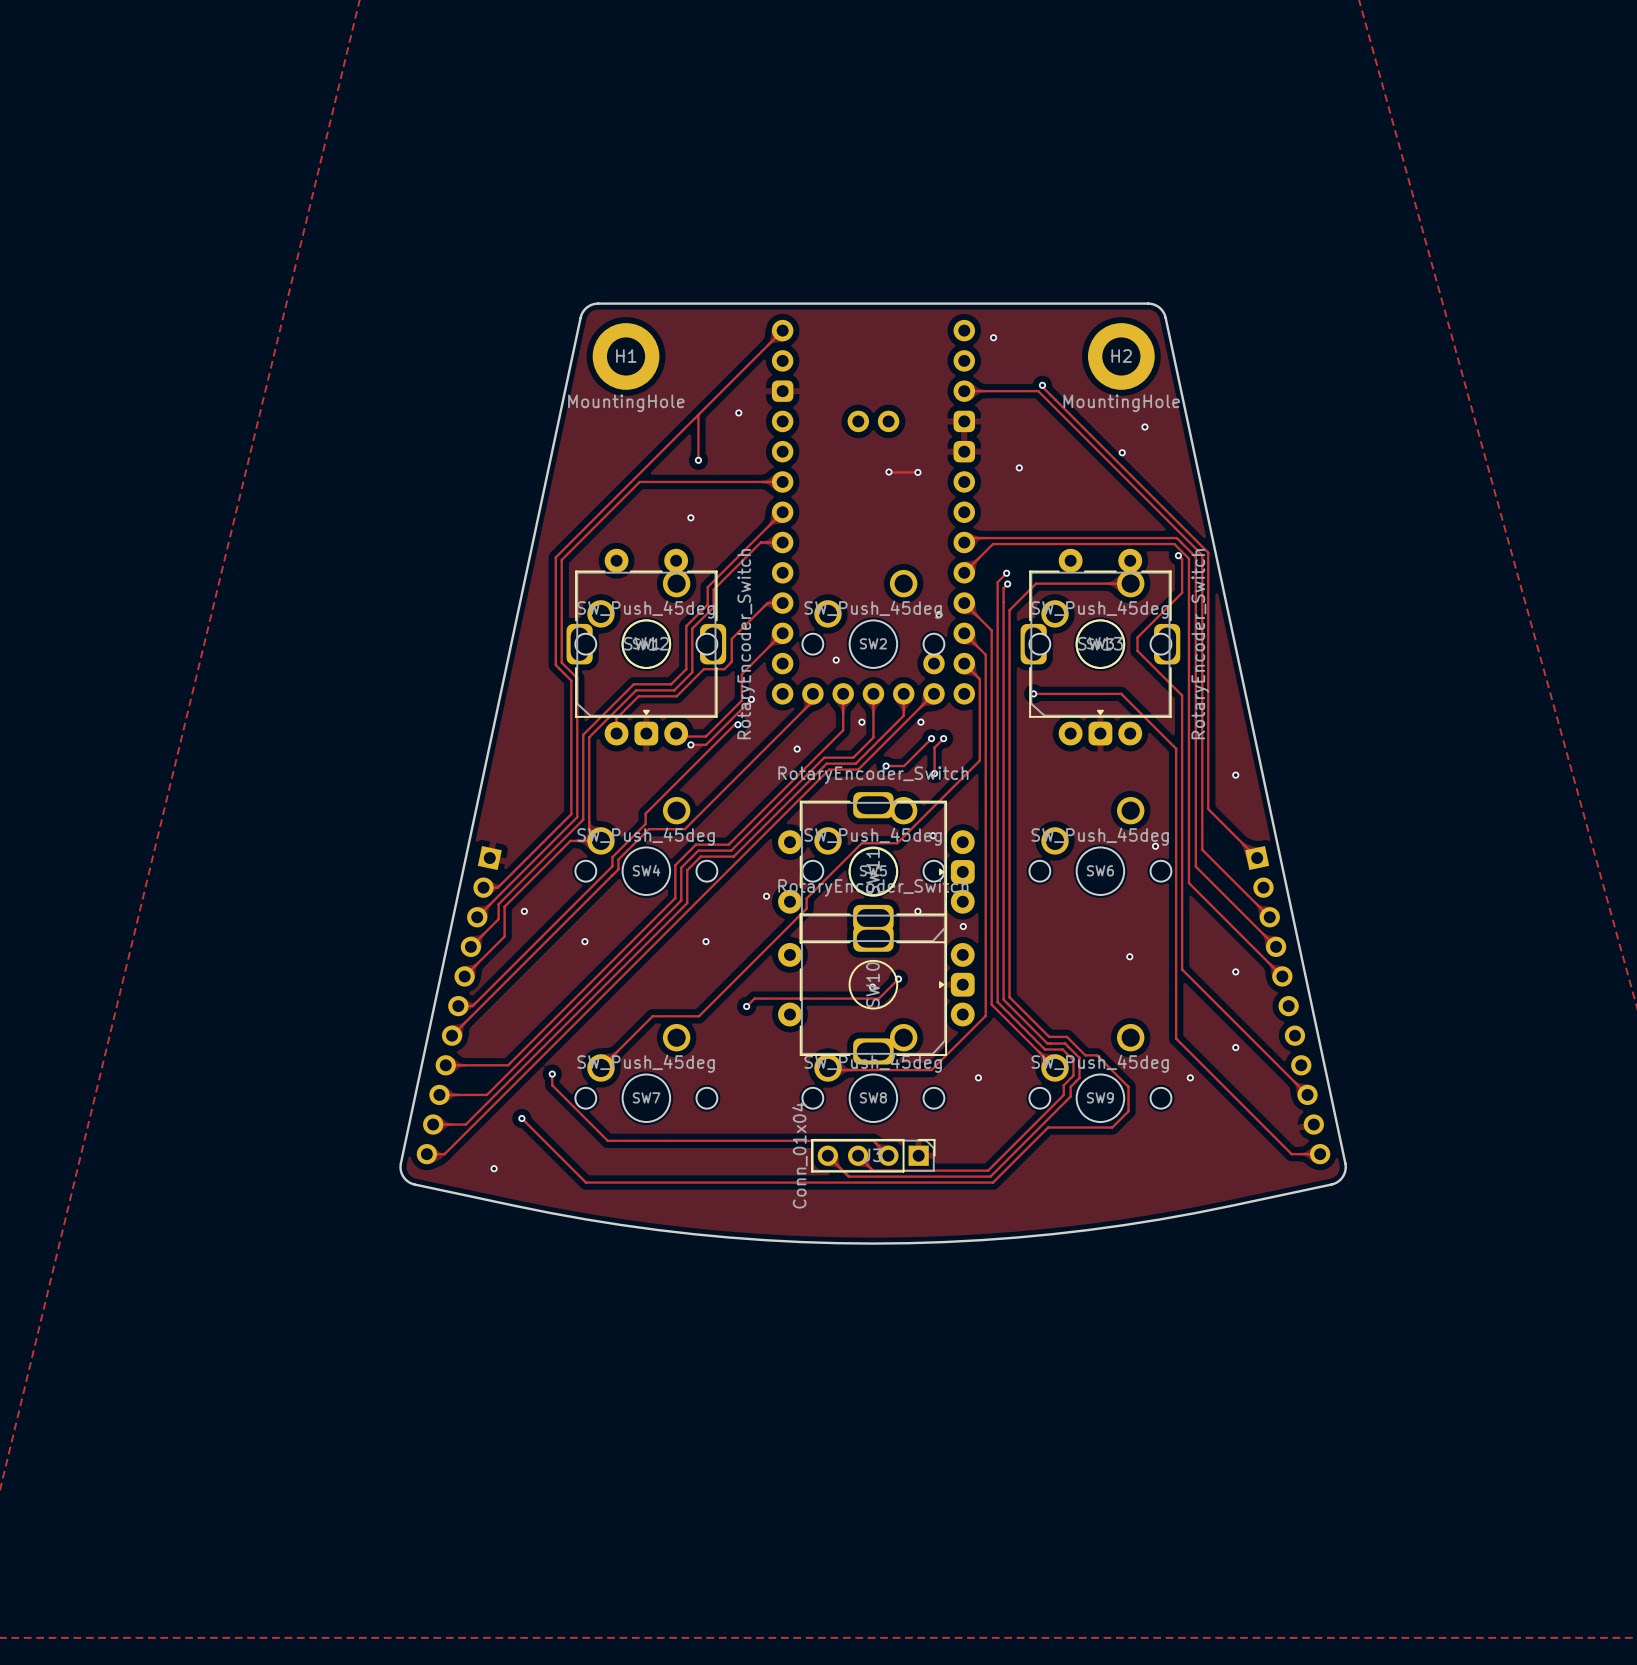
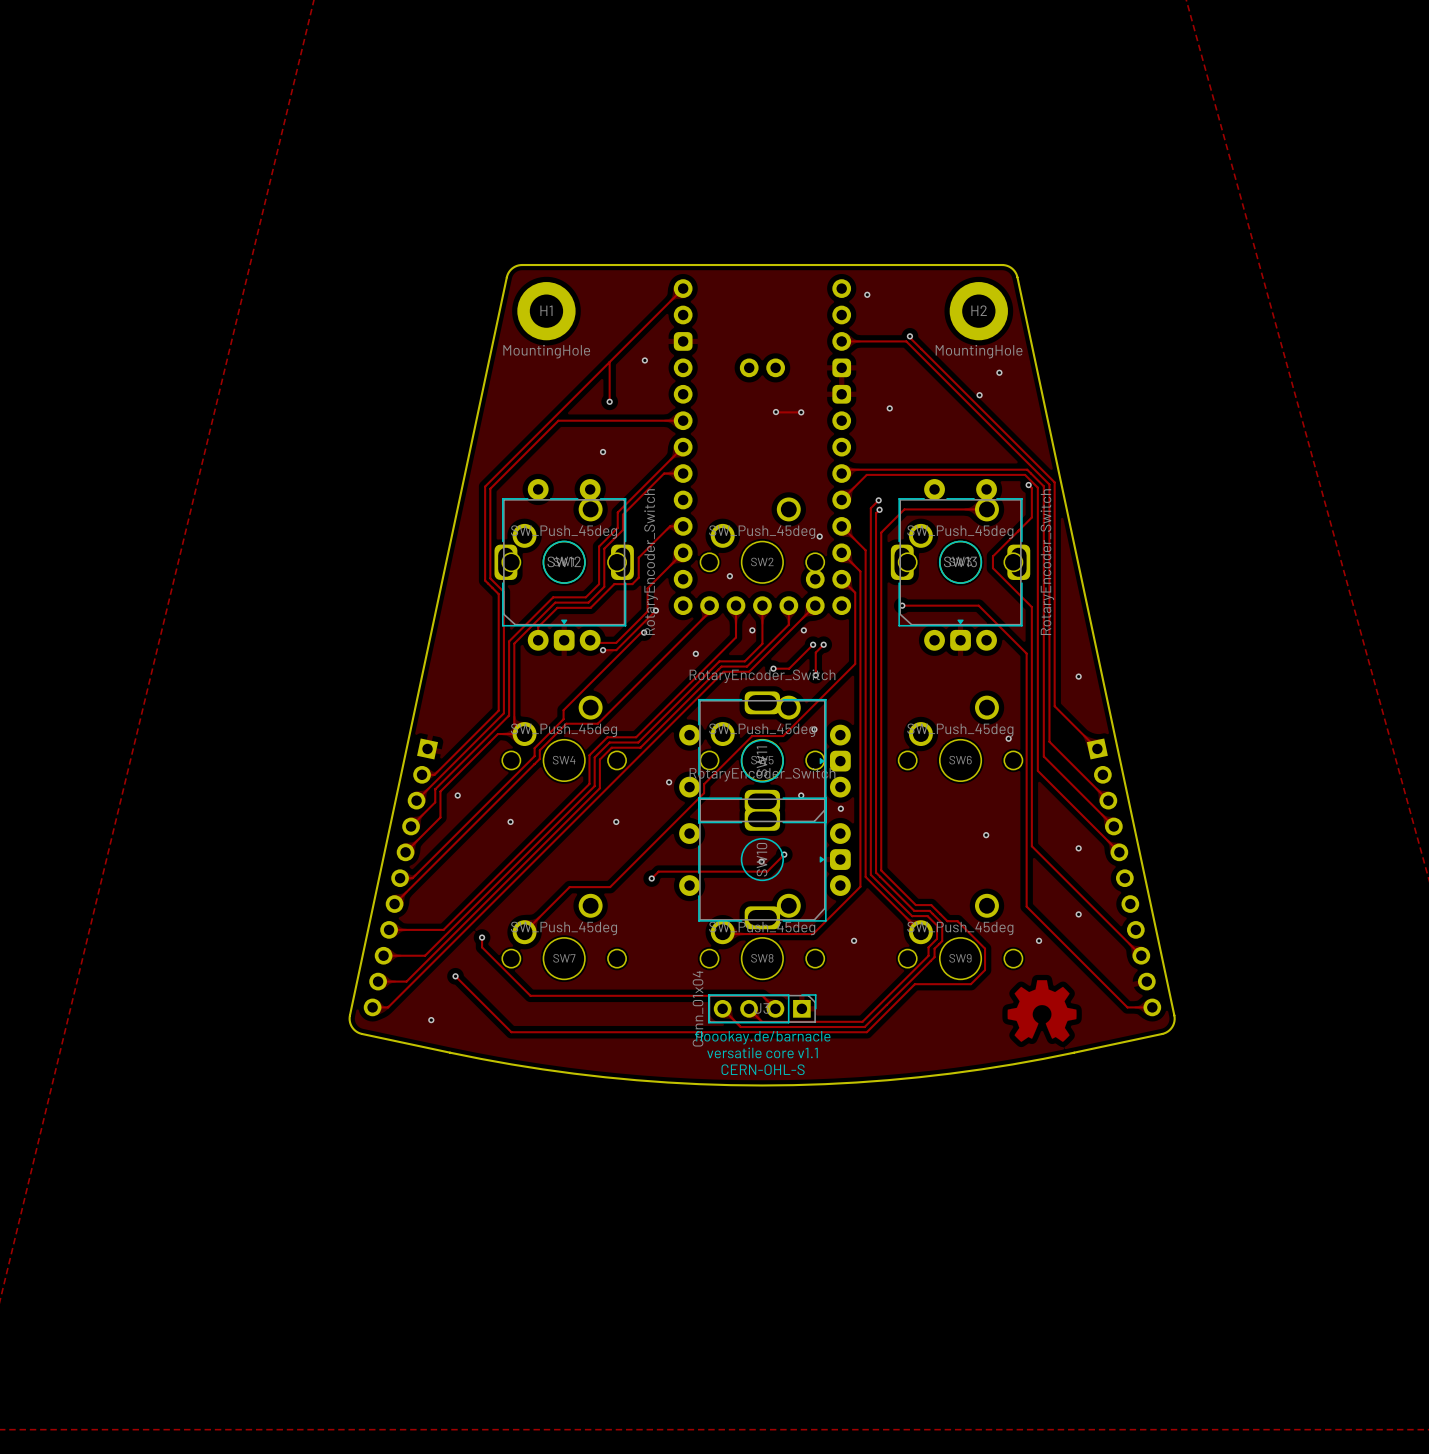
drawing: none -> [1007, 980, 1077, 1042]
text: none -> floookay.de/barnacle (762, 1037)
text: none -> versatile core v1.1 (762, 1052)
text: none -> CERN-OHL-S (763, 1069)

